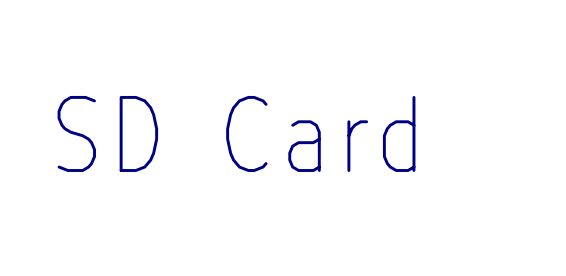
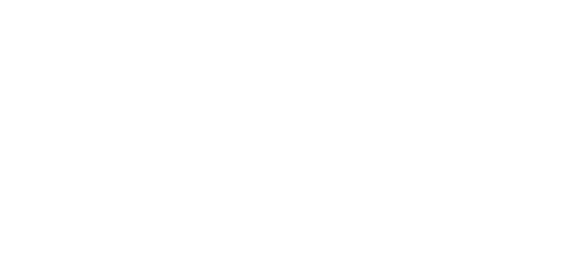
text: SD Card (236, 133) -> none

